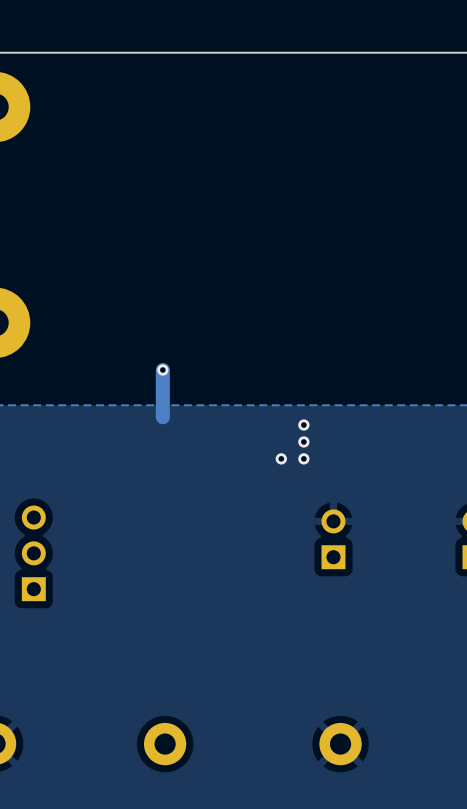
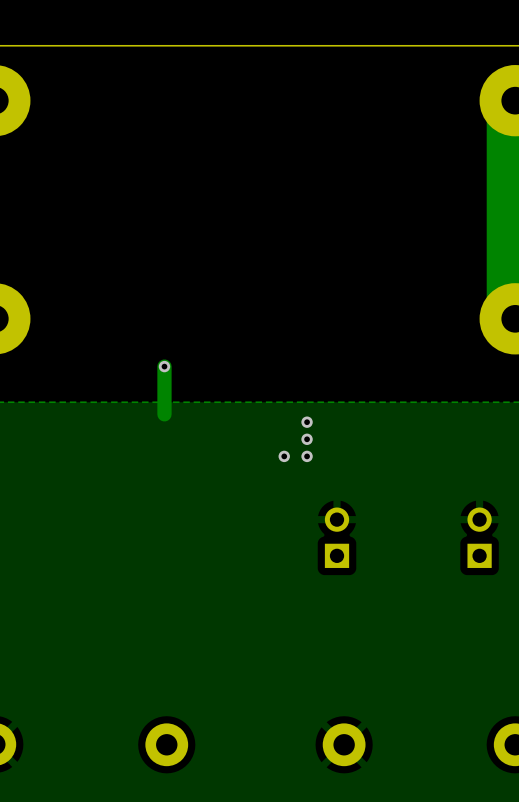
part: (33, 553) -> none

